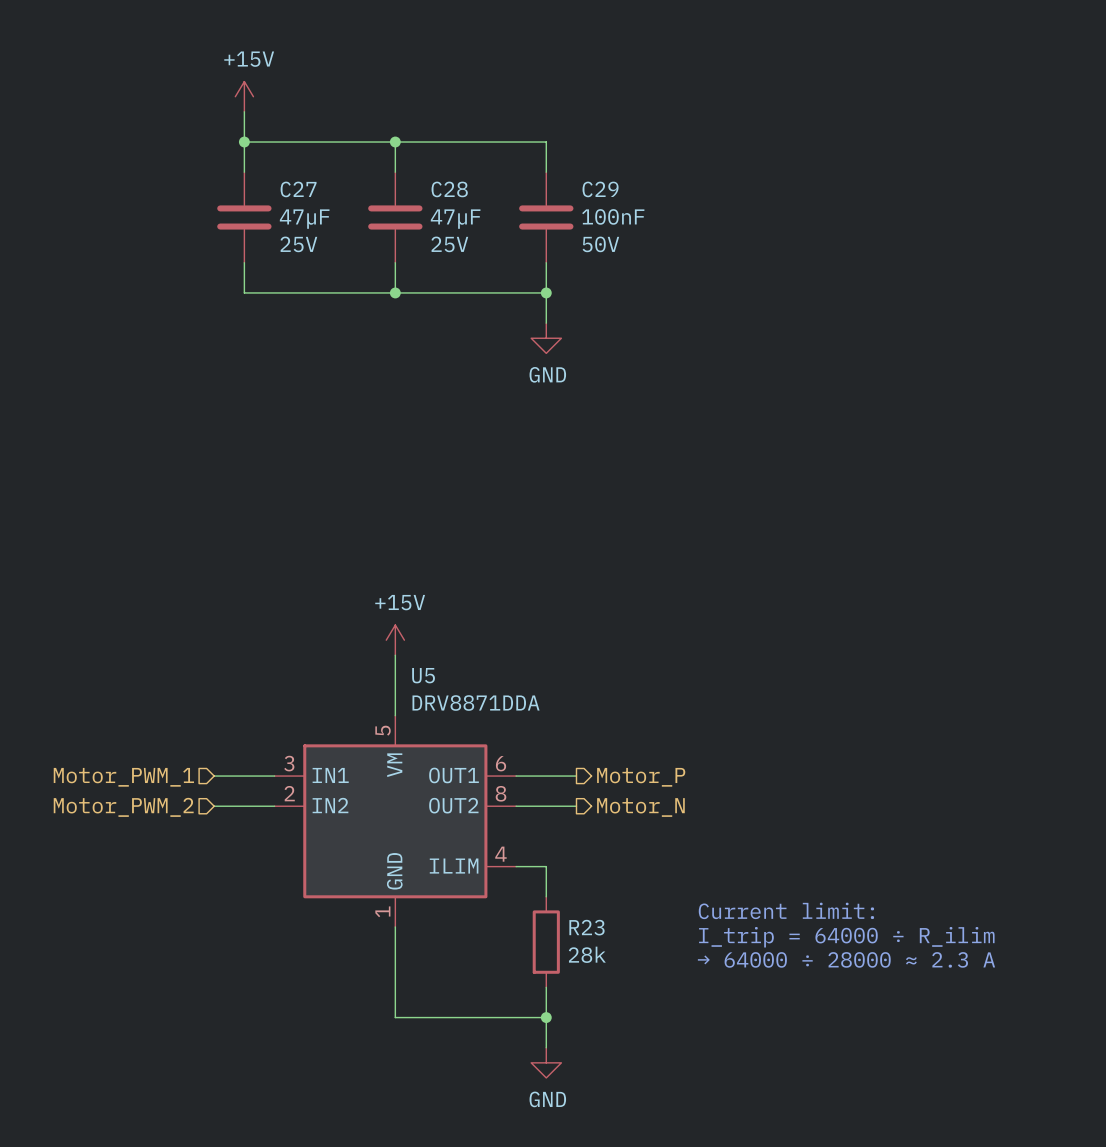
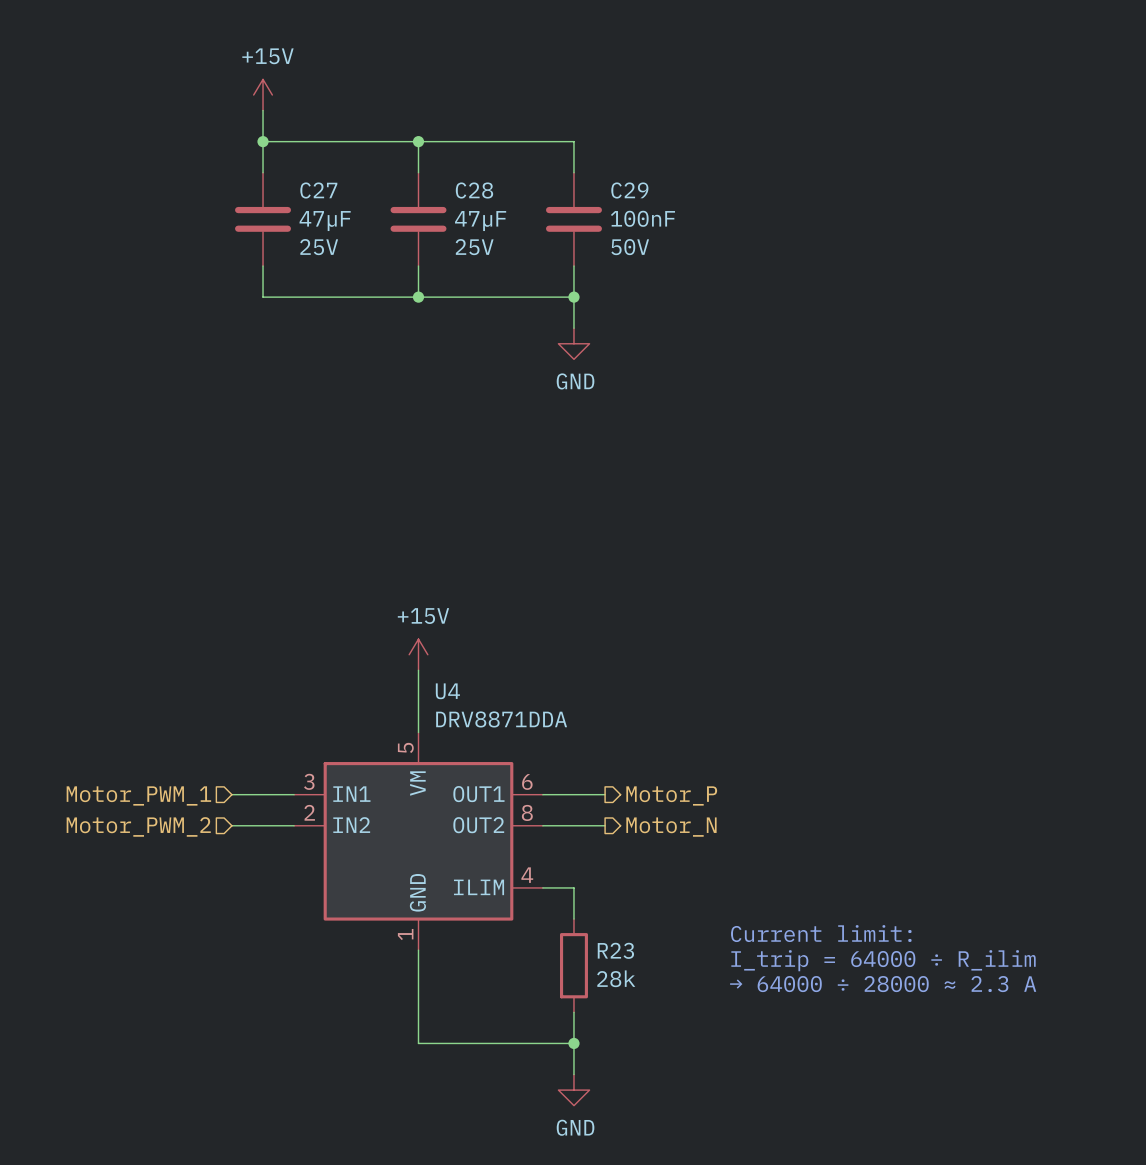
U5 name: U5 (423, 675) -> U4 (447, 691)

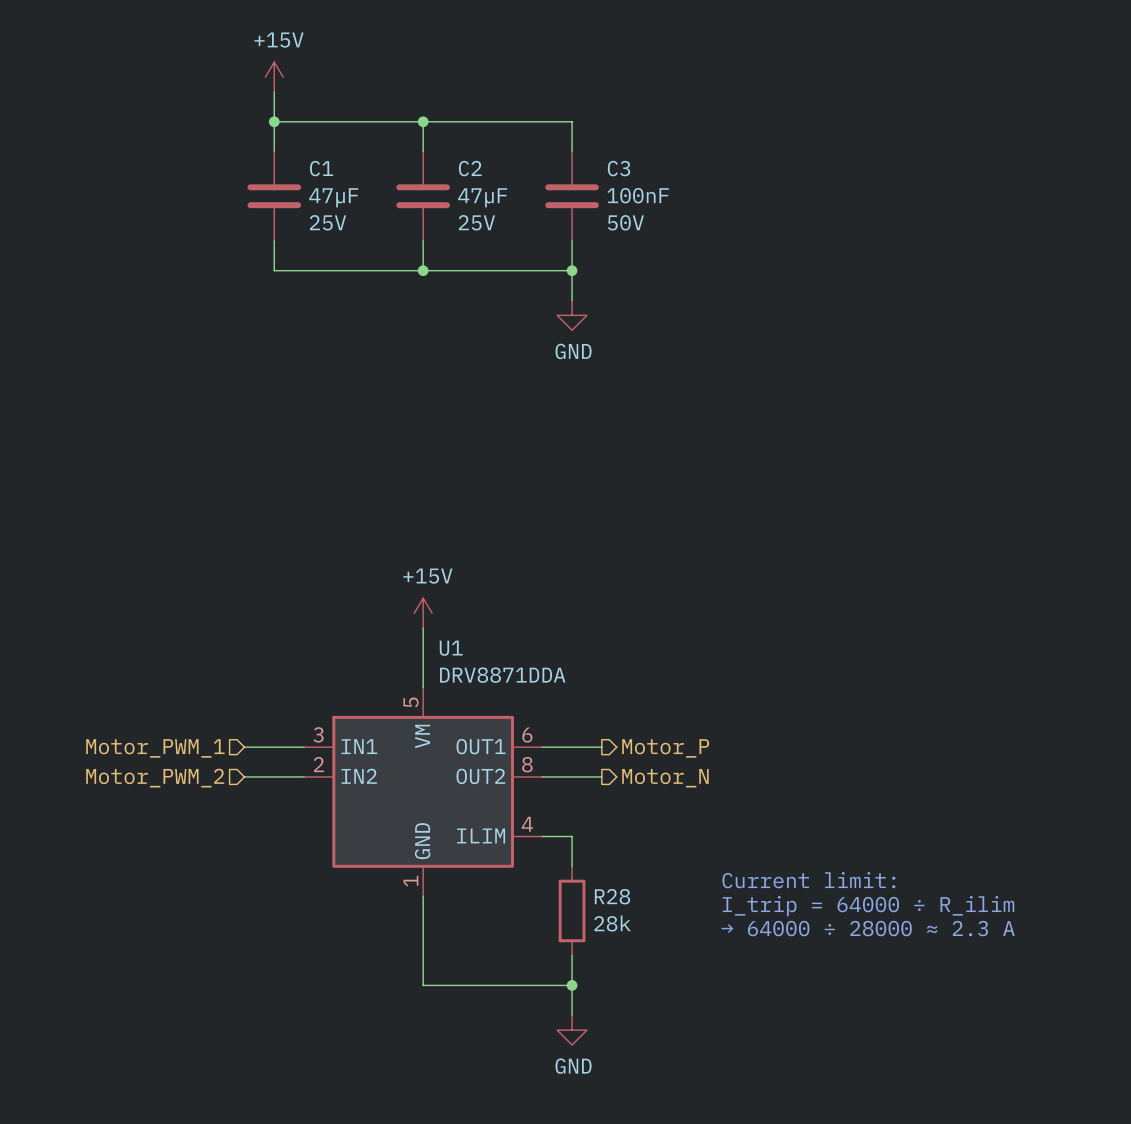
C27 name: C27 (318, 190) -> C1 (321, 168)
C28 name: C28 (474, 190) -> C2 (470, 168)
C29 name: C29 (629, 190) -> C3 (618, 168)
U4 name: U4 (447, 691) -> U1 (451, 648)
R23 name: R23 (615, 950) -> R28 (612, 896)

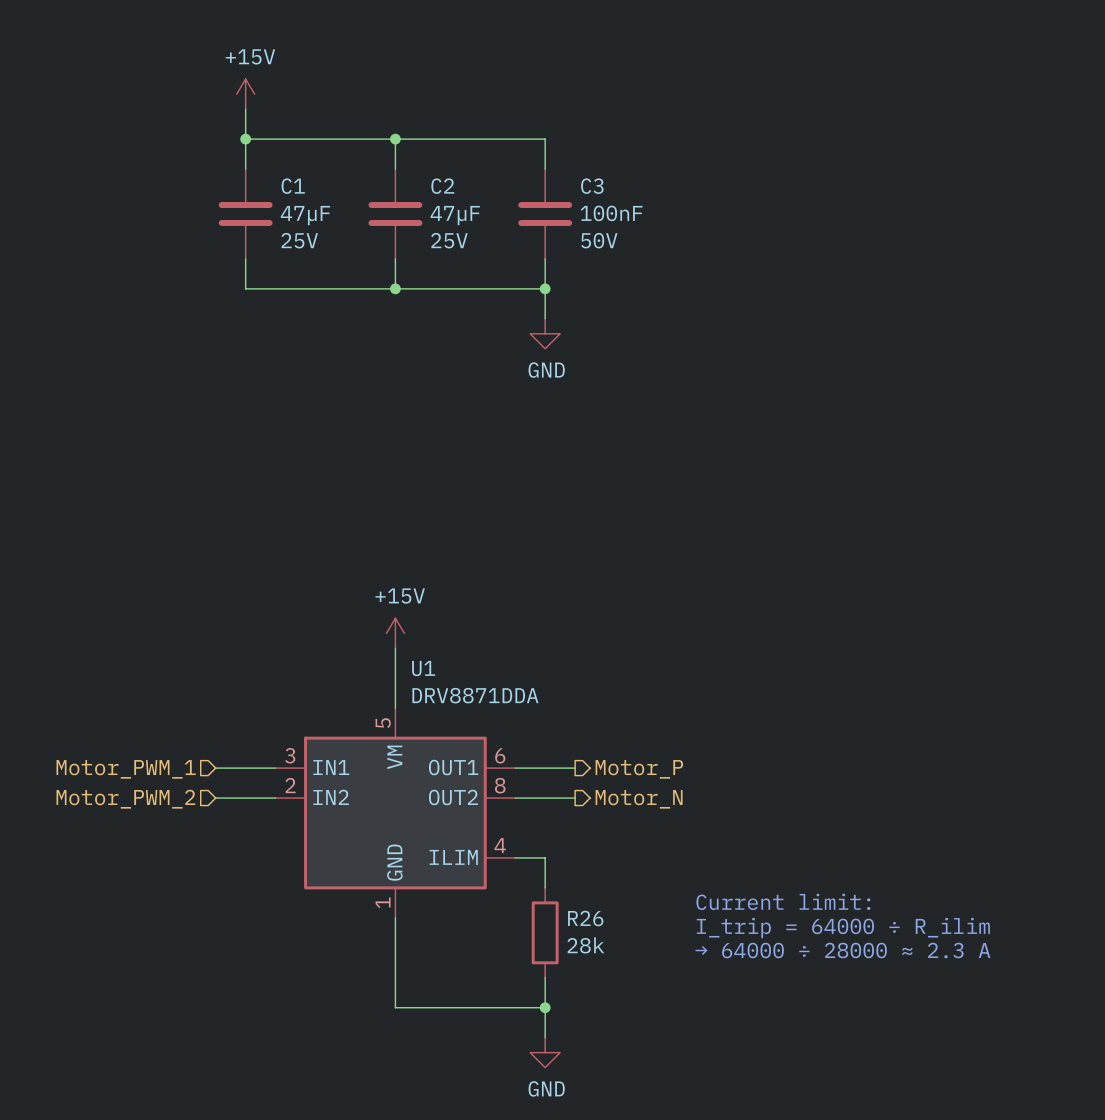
R28 name: R28 (612, 896) -> R26 (585, 918)

